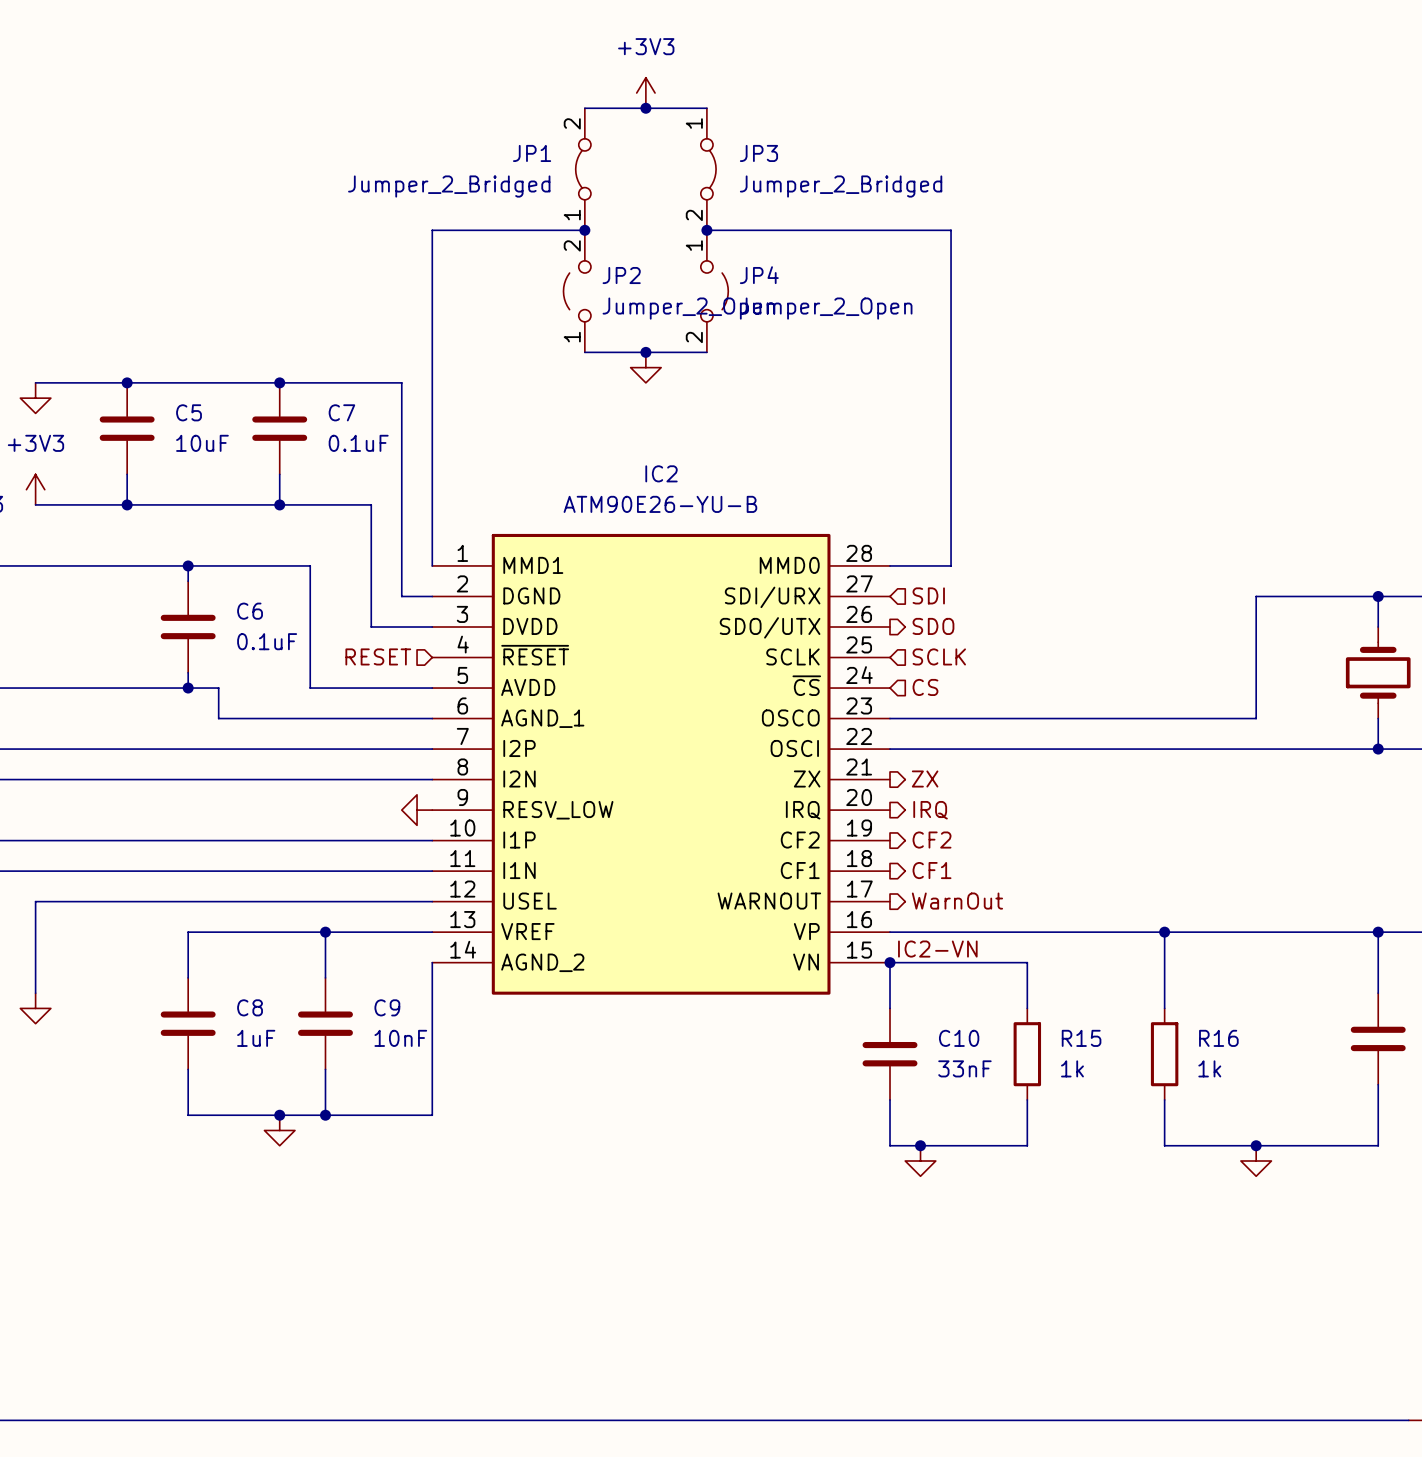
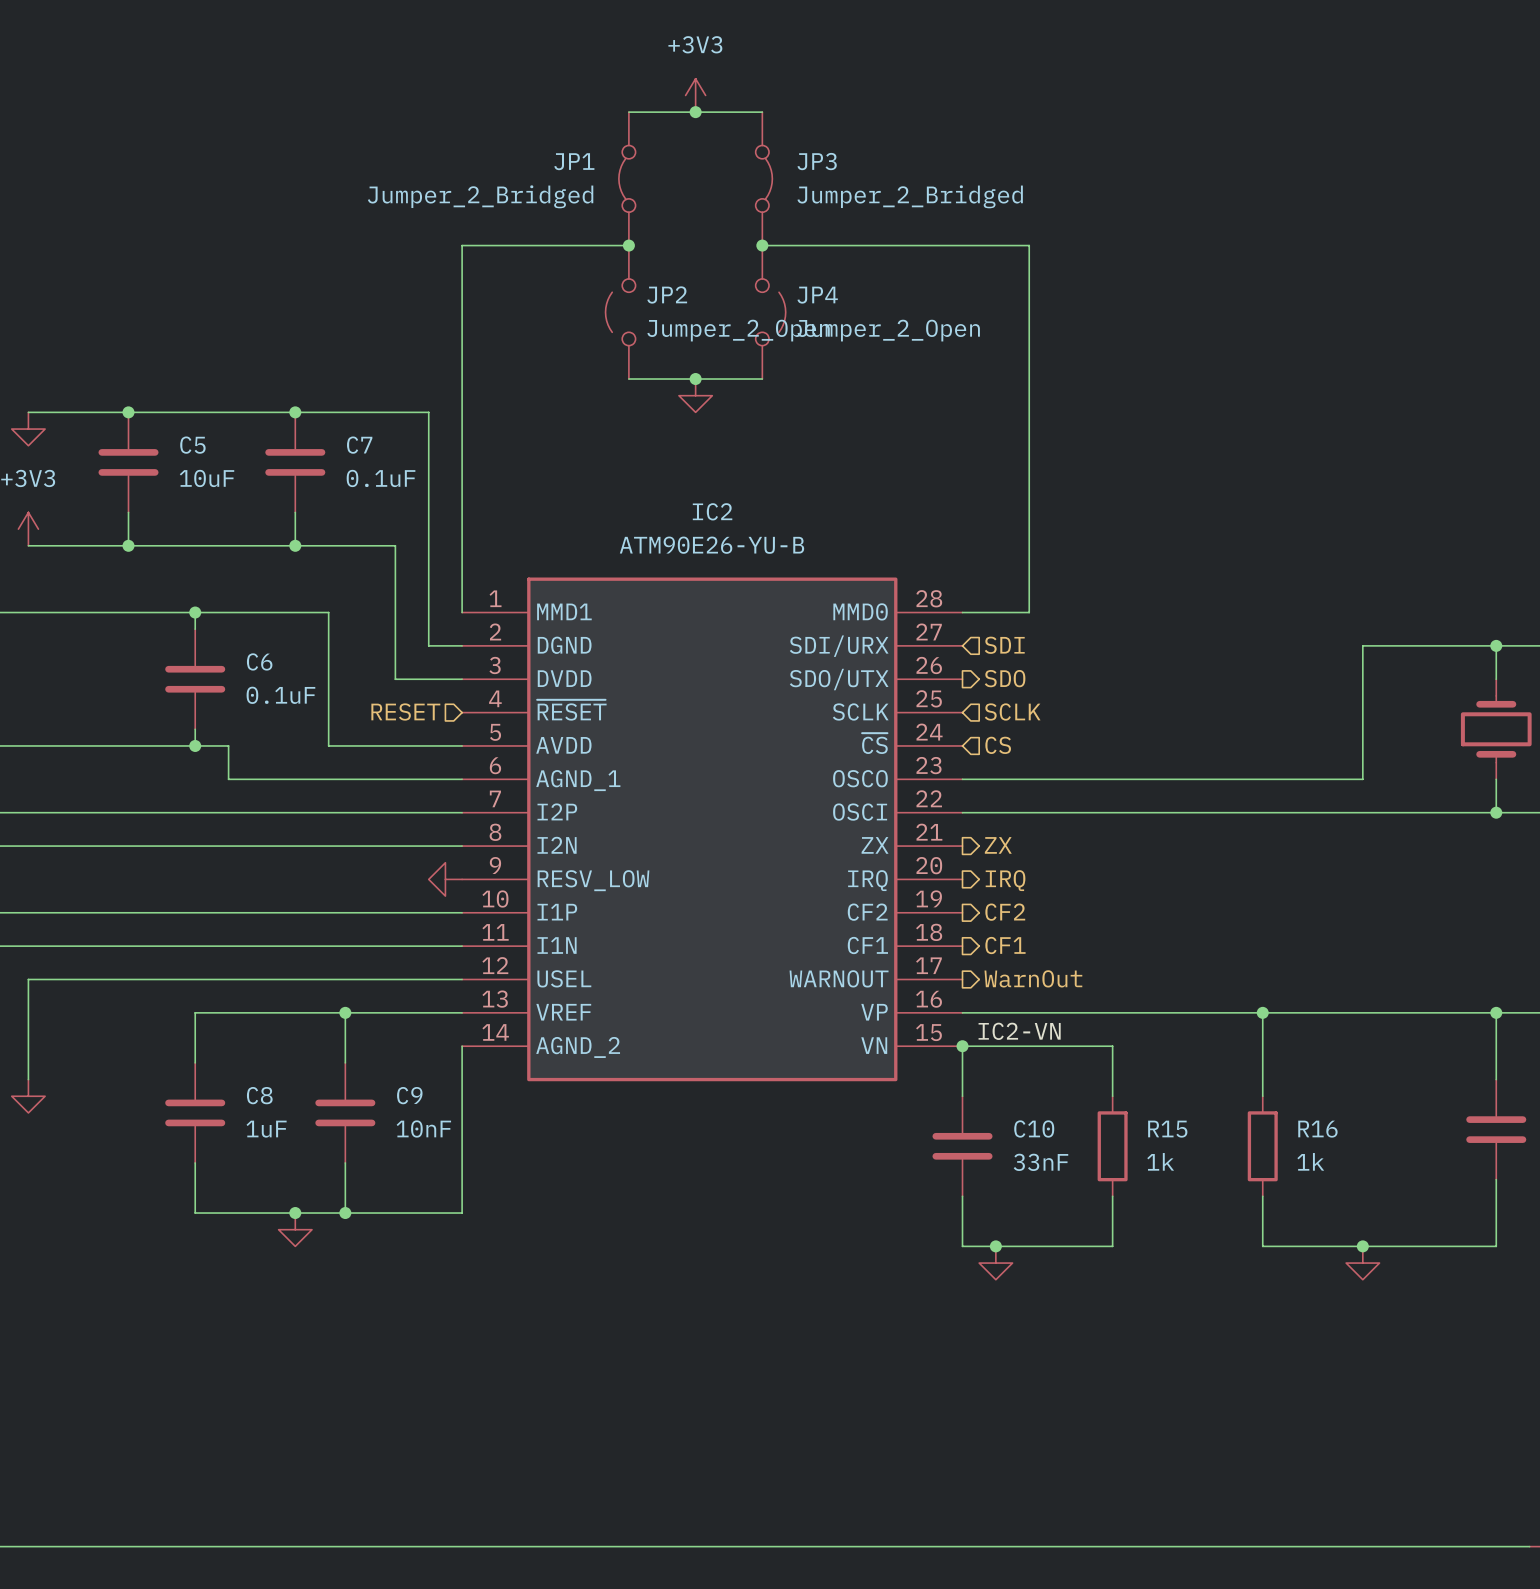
JP1 pin number: 2 (572, 123) -> none
JP3 pin number: 1 (694, 123) -> none
JP1 pin number: 1 (572, 215) -> none
JP3 pin number: 2 (694, 215) -> none
JP2 pin number: 2 (572, 245) -> none
JP4 pin number: 1 (694, 245) -> none
JP2 pin number: 1 (572, 337) -> none
JP4 pin number: 2 (694, 337) -> none

